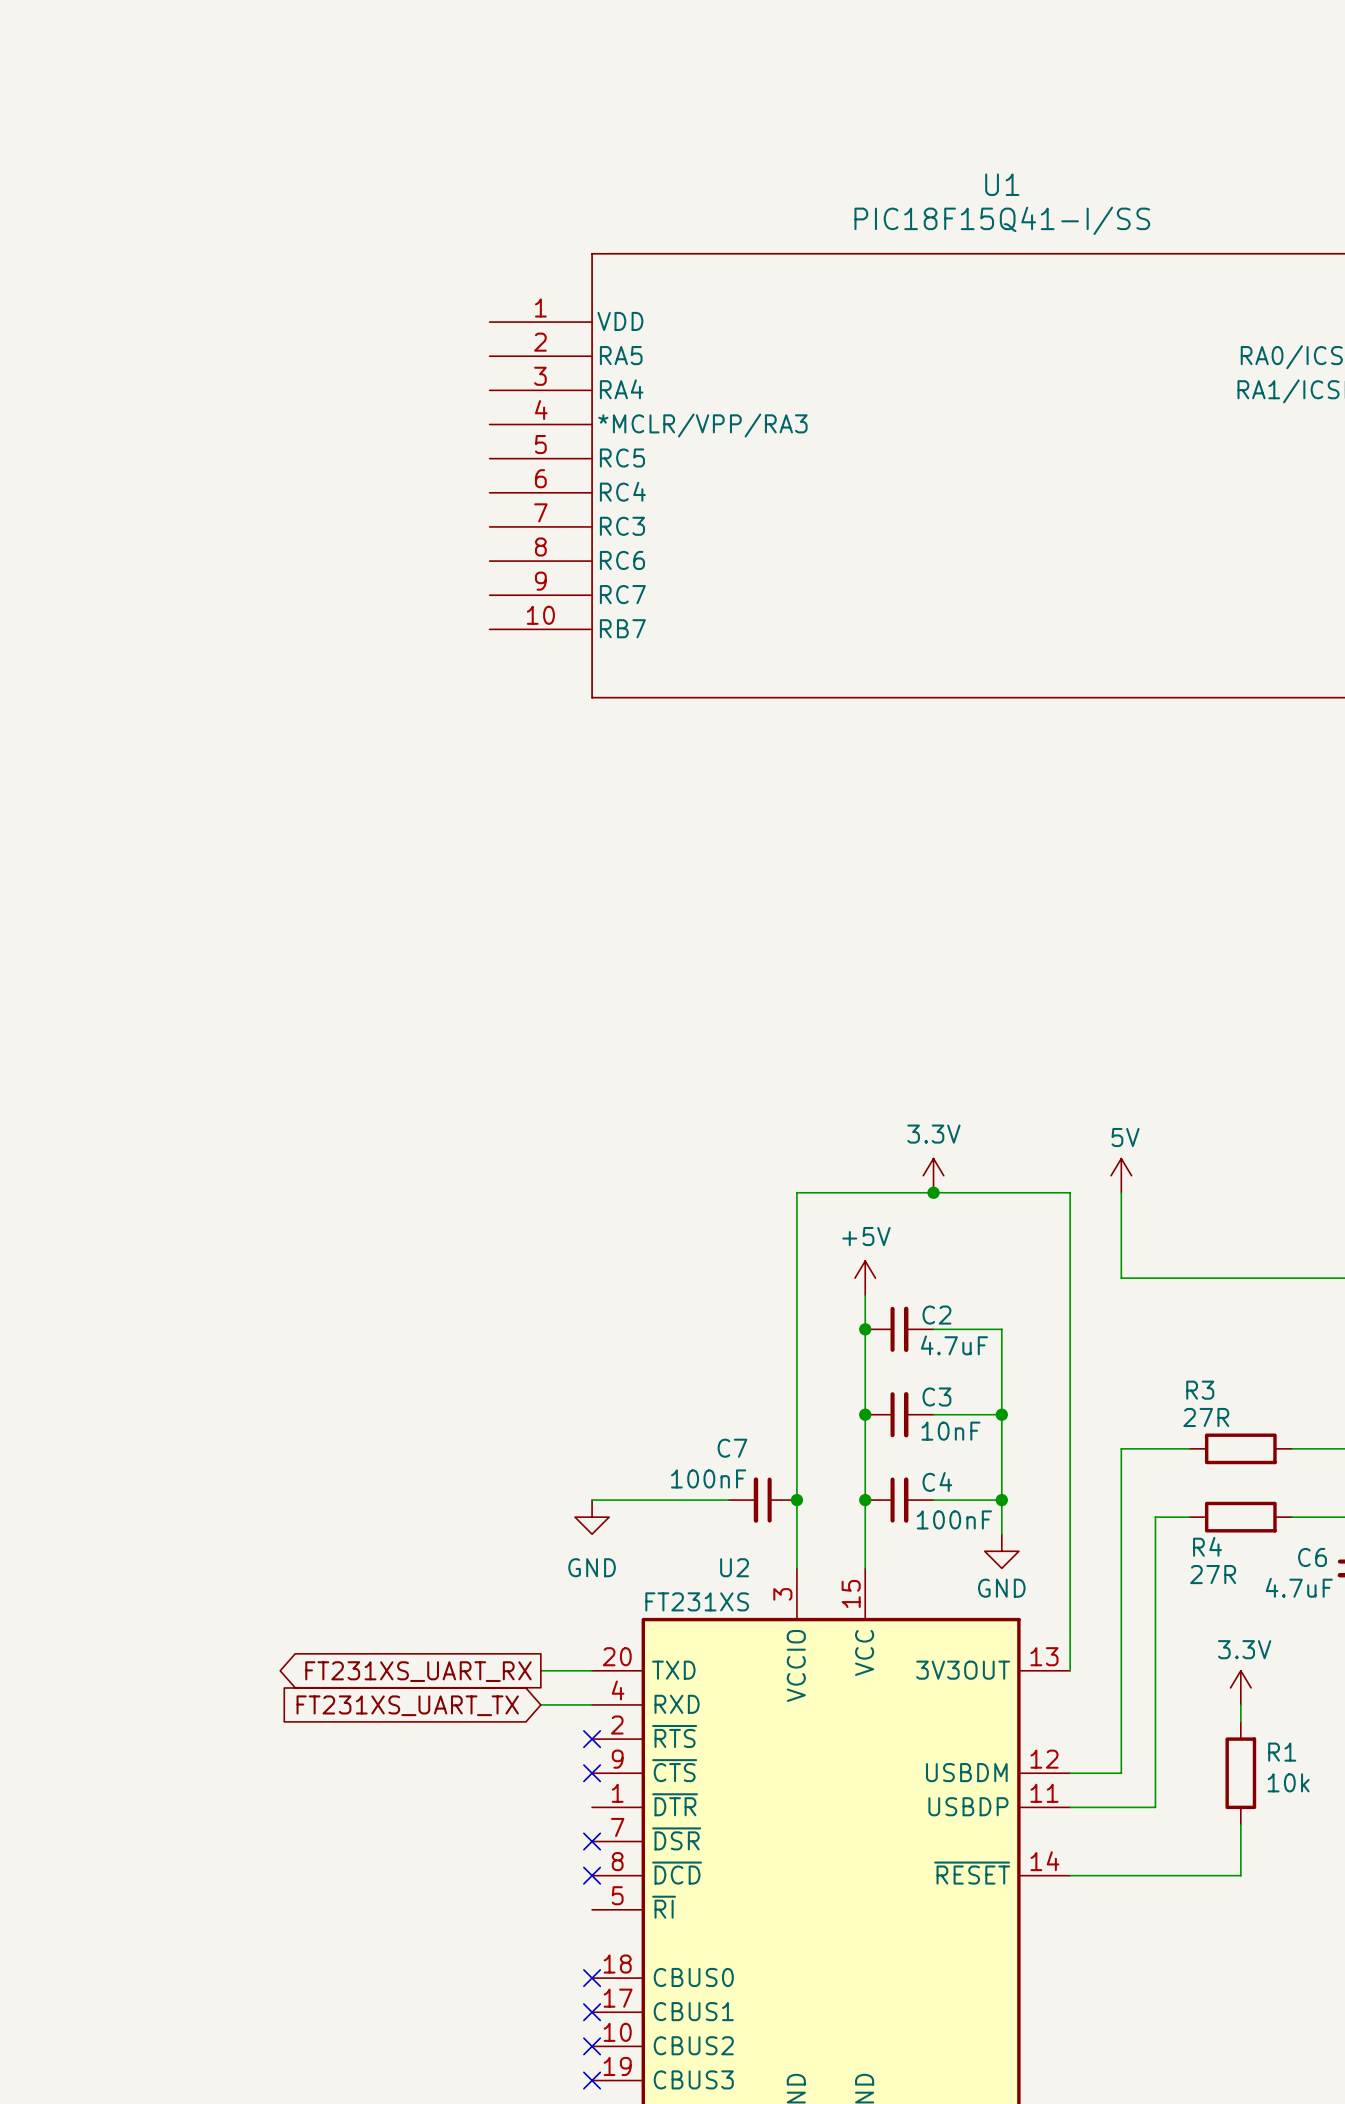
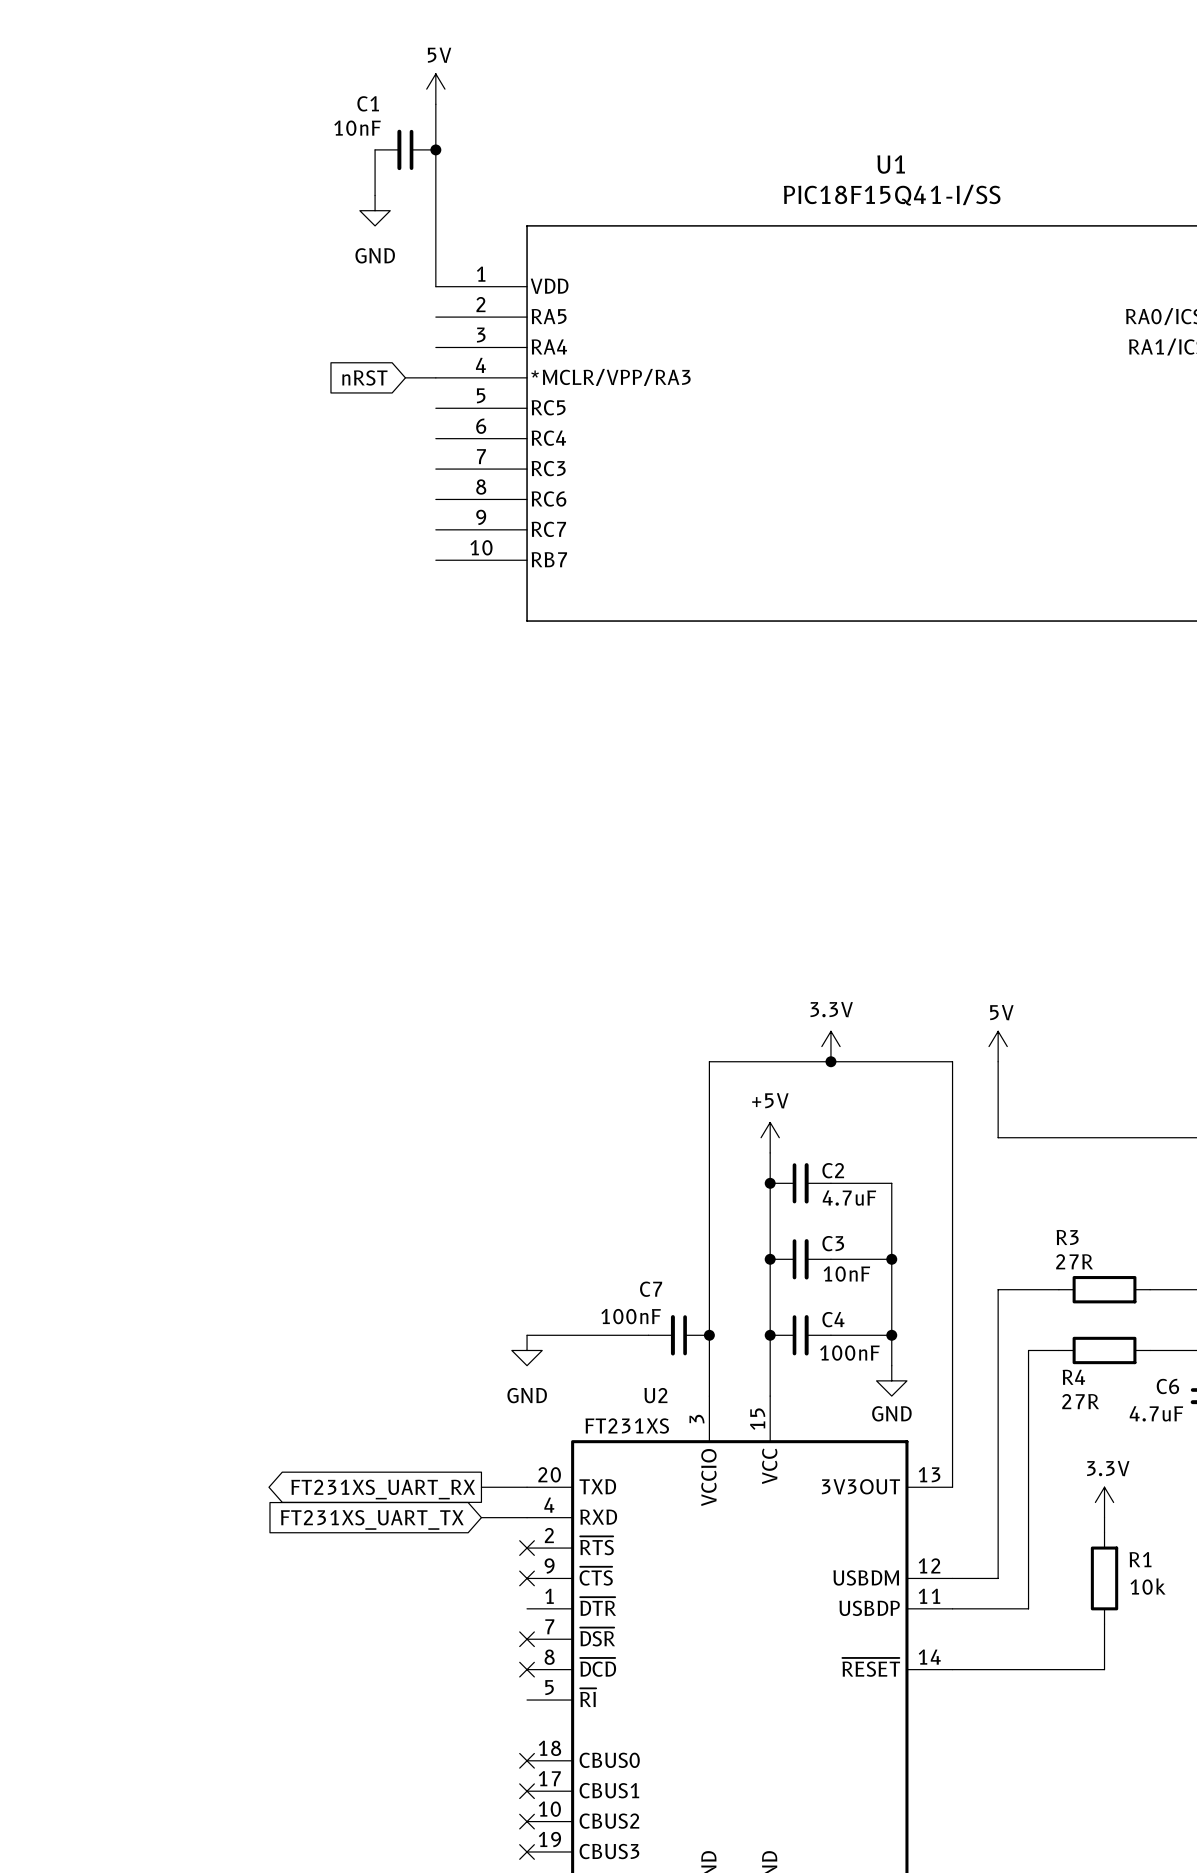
power symbol: none -> 5V (435, 89)
wire: none -> (435, 104) (435, 286)
wire: none -> (375, 149) (375, 195)
C1: none -> 10nF (405, 149)
junction: none -> (435, 149)
power symbol: none -> GND (375, 210)
global label: none -> nRST (364, 377)
wire: none -> (405, 377) (435, 377)

